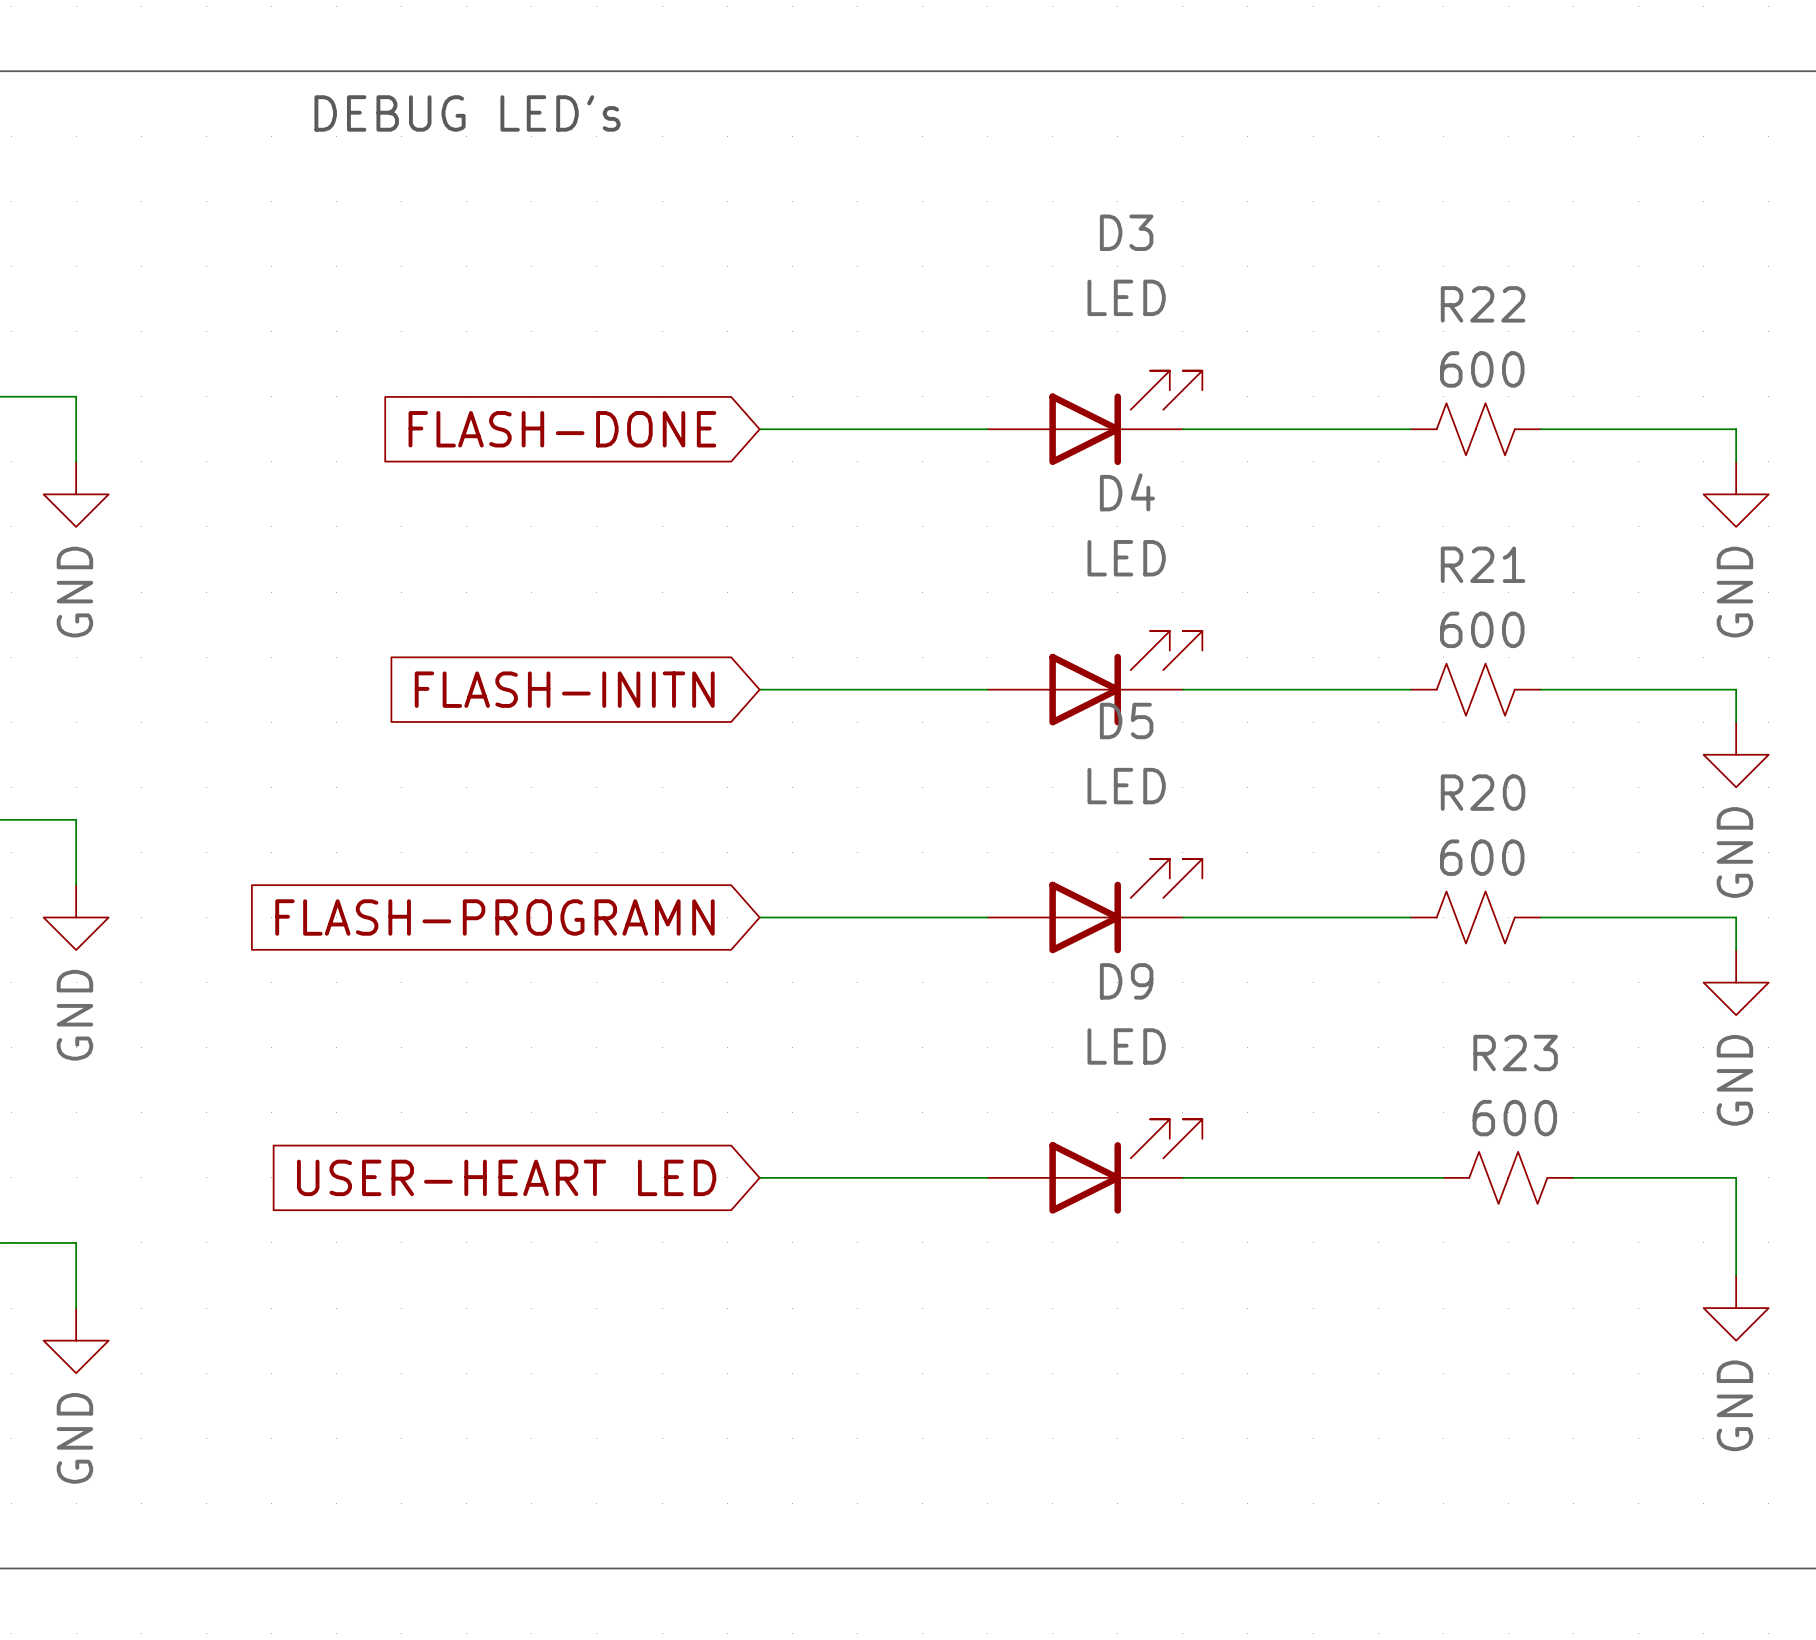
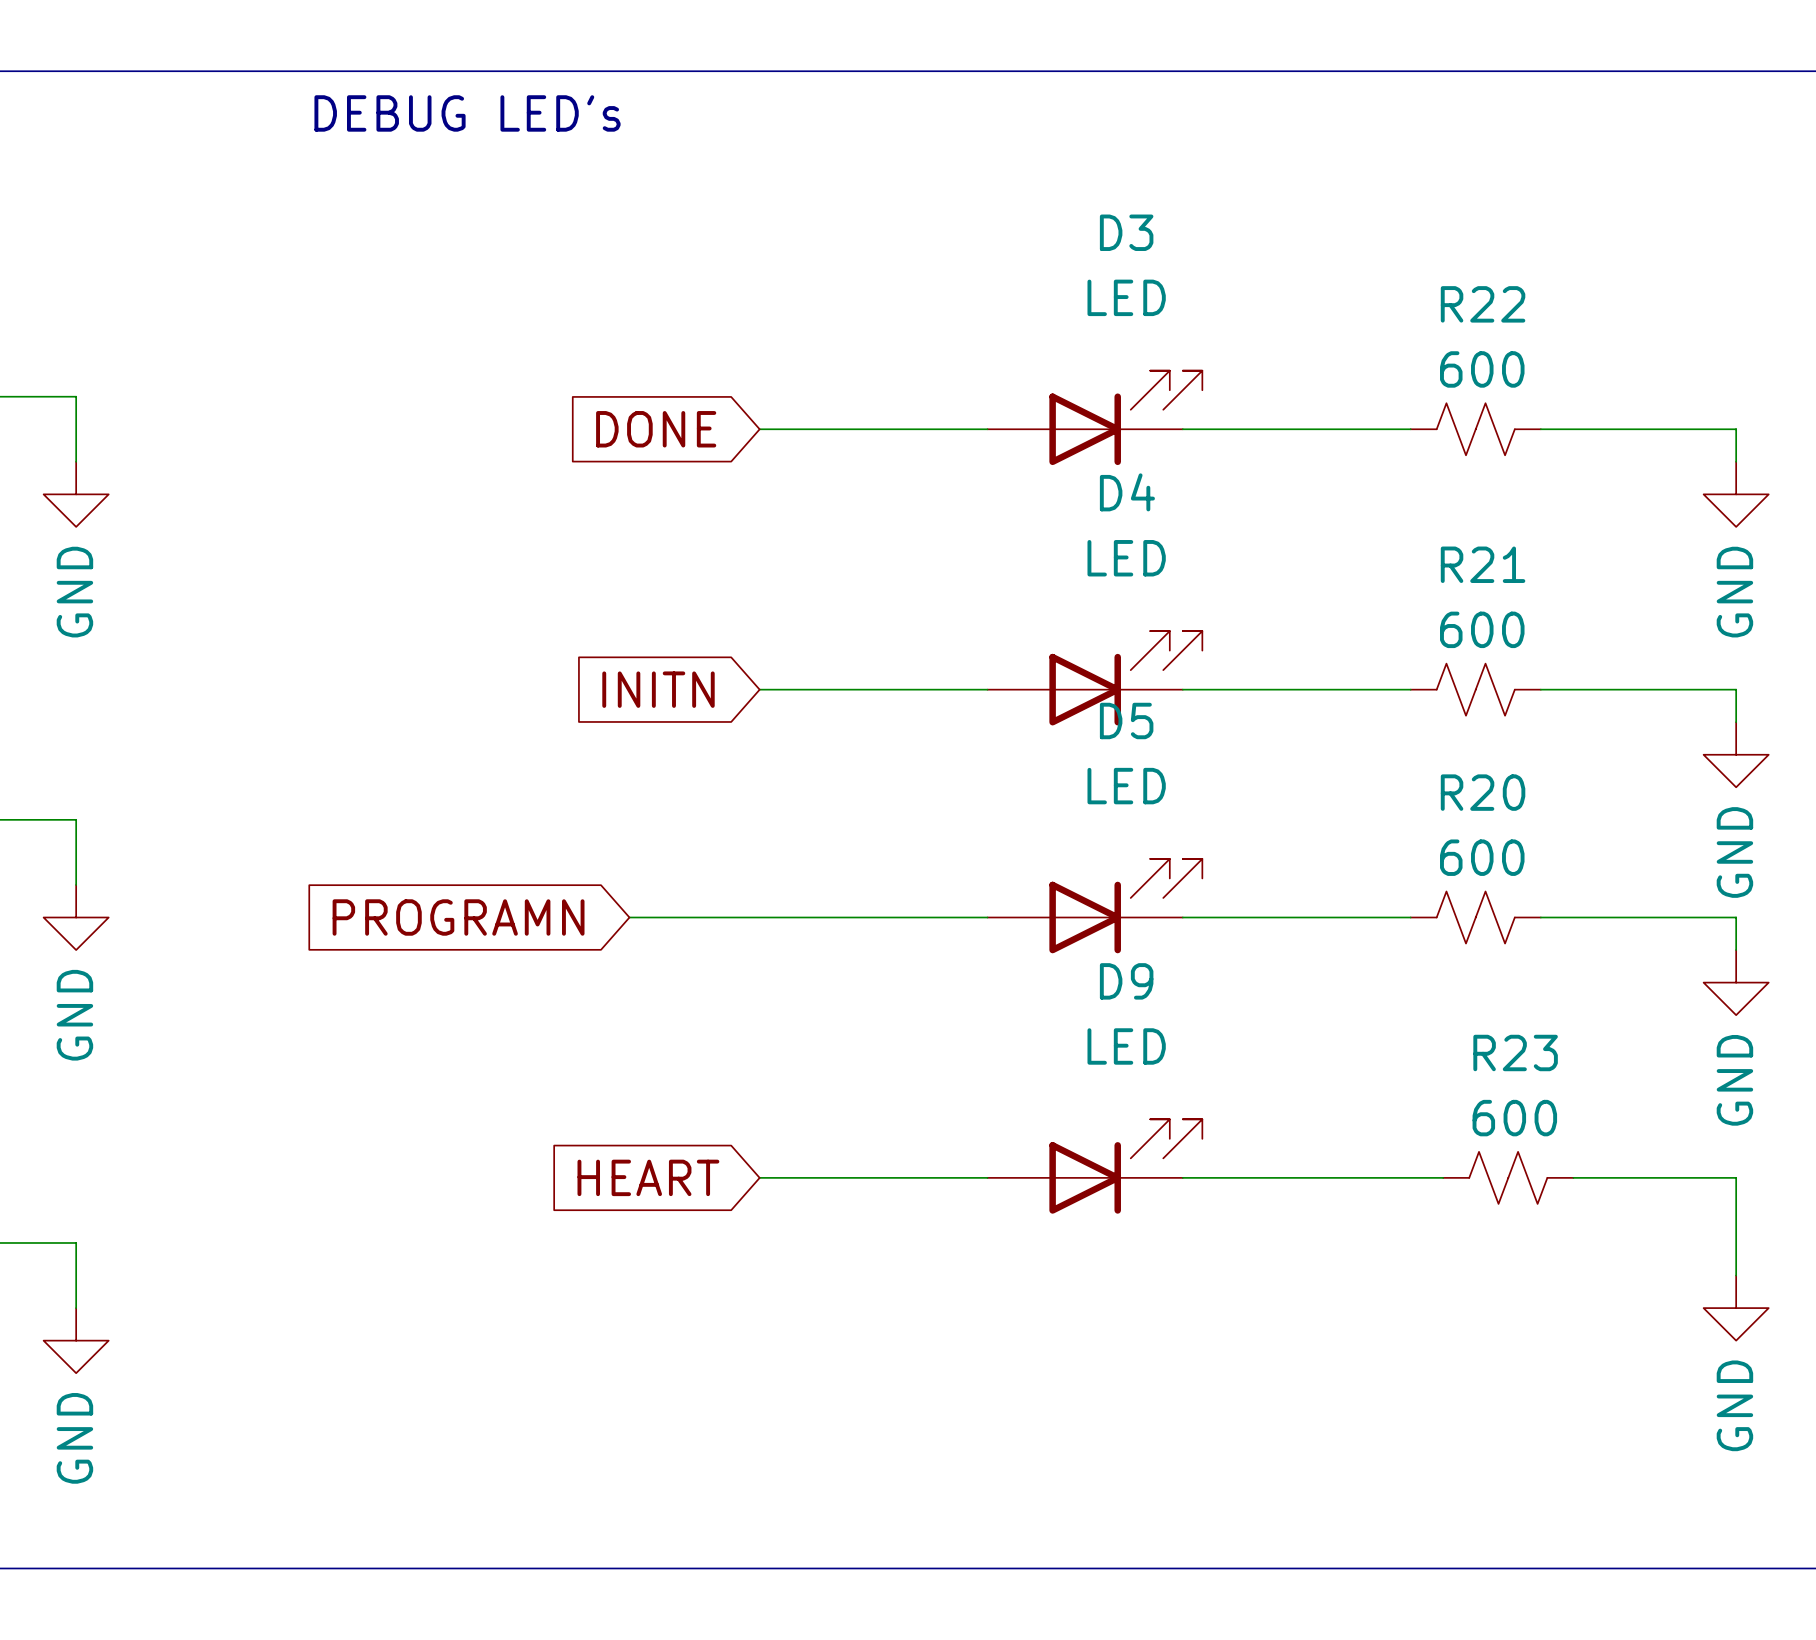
global label: FLASH-DONE (562, 429) -> DONE (656, 429)
global label: FLASH-INITN (564, 689) -> INITN (658, 689)
global label: FLASH-PROGRAMN (494, 917) -> PROGRAMN (458, 917)
wire: none -> (629, 917) (759, 917)
global label: USER-HEART LED (506, 1177) -> HEART (648, 1177)

